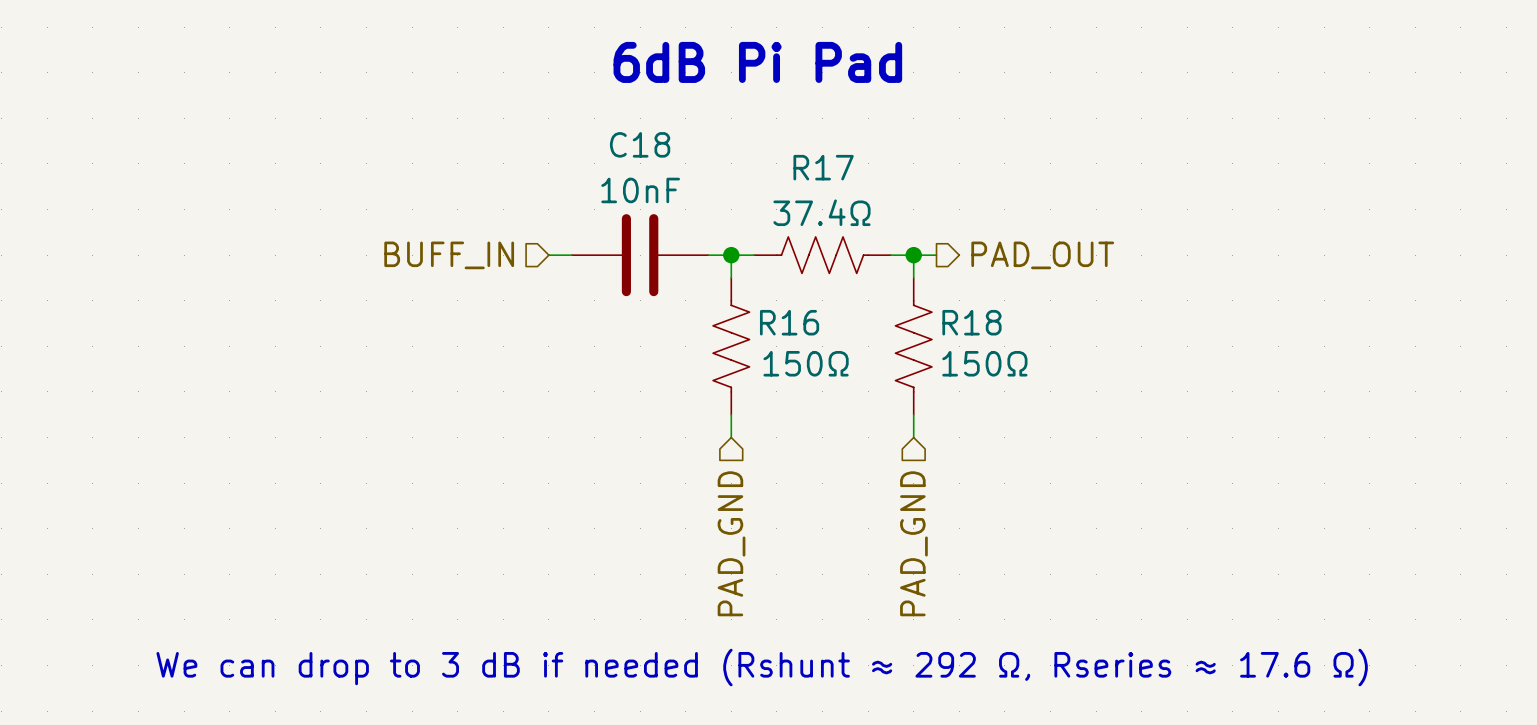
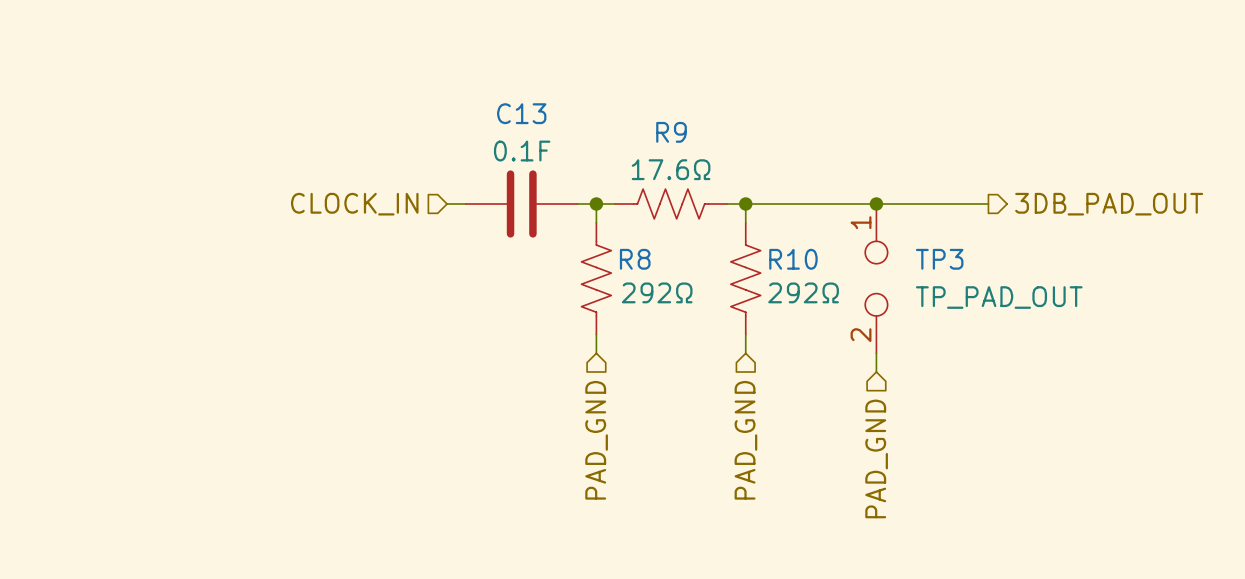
text: 6dB Pi Pad (757, 62) -> none
C18 name: C18 (640, 144) -> C13 (521, 113)
R17 name: R17 (823, 167) -> R9 (671, 132)
C18 value: 10nF (640, 190) -> 0.1F (522, 151)
R17 value: 37.4Ω (821, 212) -> 17.6Ω (671, 169)
hierarchical label: BUFF_IN (449, 255) -> CLOCK_IN (354, 204)
wire: none -> (764, 203) (988, 203)
hierarchical label: PAD_OUT (1042, 255) -> none
junction: none -> (876, 203)
hierarchical label: none -> 3DB_PAD_OUT (1109, 204)
R16 name: R16 (789, 322) -> R8 (635, 259)
R18 name: R18 (971, 322) -> R10 (793, 259)
TP3: none -> TP_PAD_OUT (876, 278)
R16 value: 150Ω (806, 363) -> 292Ω (657, 292)
R18 value: 150Ω (984, 363) -> 292Ω (803, 292)
wire: none -> (876, 353) (876, 372)
hierarchical label: none -> PAD_GND (876, 458)
text: We can drop to 3 dB if needed (Rshunt ≈ 292 Ω, Rseries ≈ 17.6 Ω) (762, 667) -> none

